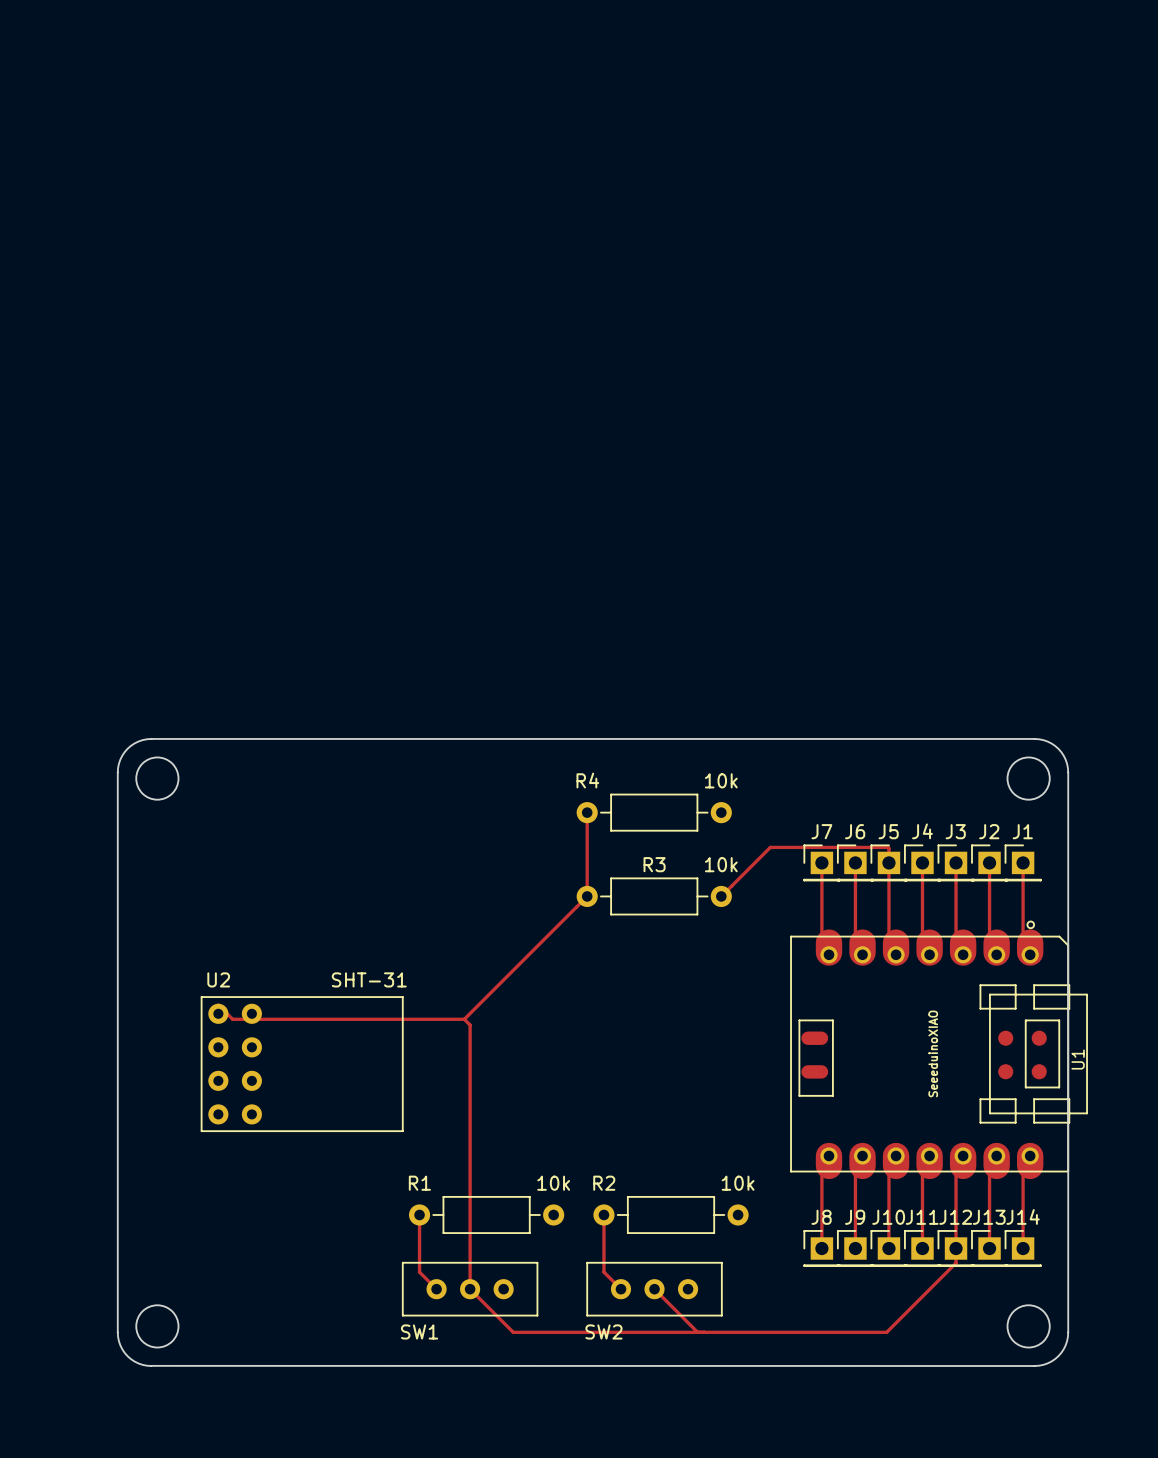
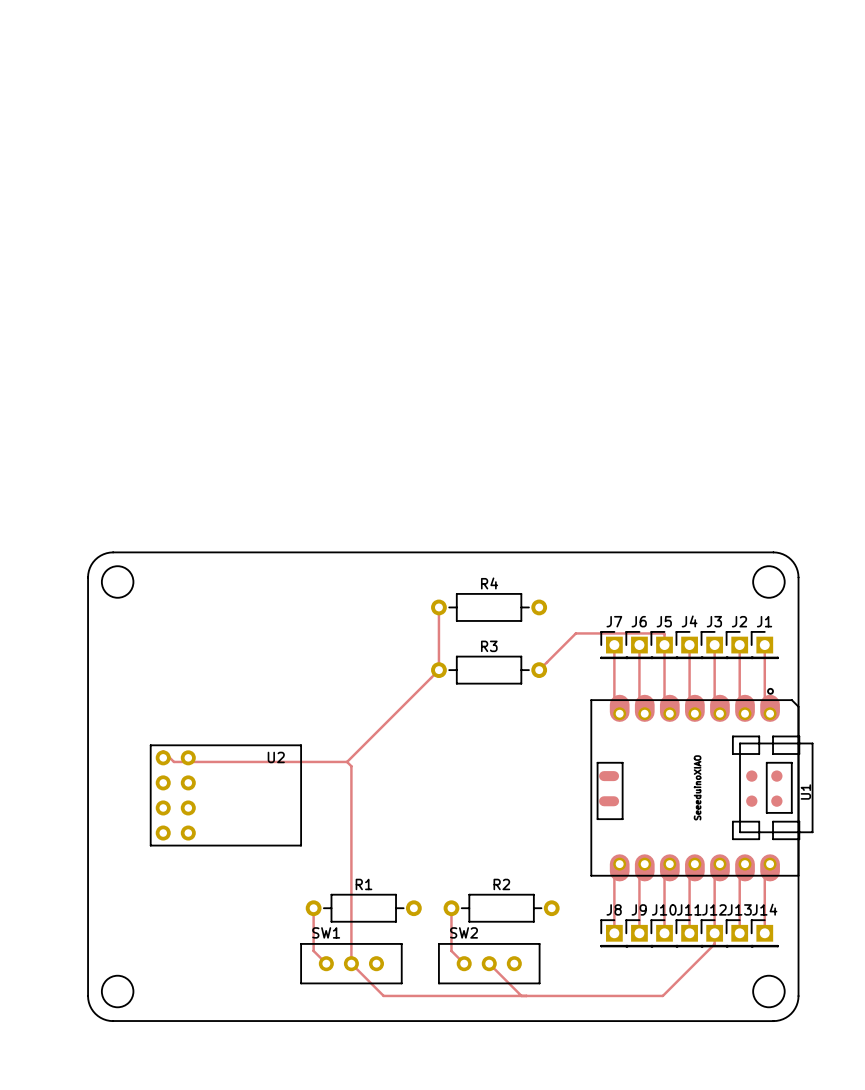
R4 name position: R4 (587, 780) -> R4 (489, 583)
text: 10k (721, 780) -> none
text: 10k (721, 864) -> none
U2 name position: U2 (218, 979) -> U2 (276, 757)
text: SHT-31 (369, 979) -> none
R1 name position: R1 (419, 1183) -> R1 (363, 884)
text: 10k (553, 1183) -> none
R2 name position: R2 (604, 1183) -> R2 (501, 884)
text: 10k (738, 1183) -> none
SW1 name position: SW1 (419, 1331) -> SW1 (326, 932)
SW2 name position: SW2 (603, 1331) -> SW2 (464, 932)

